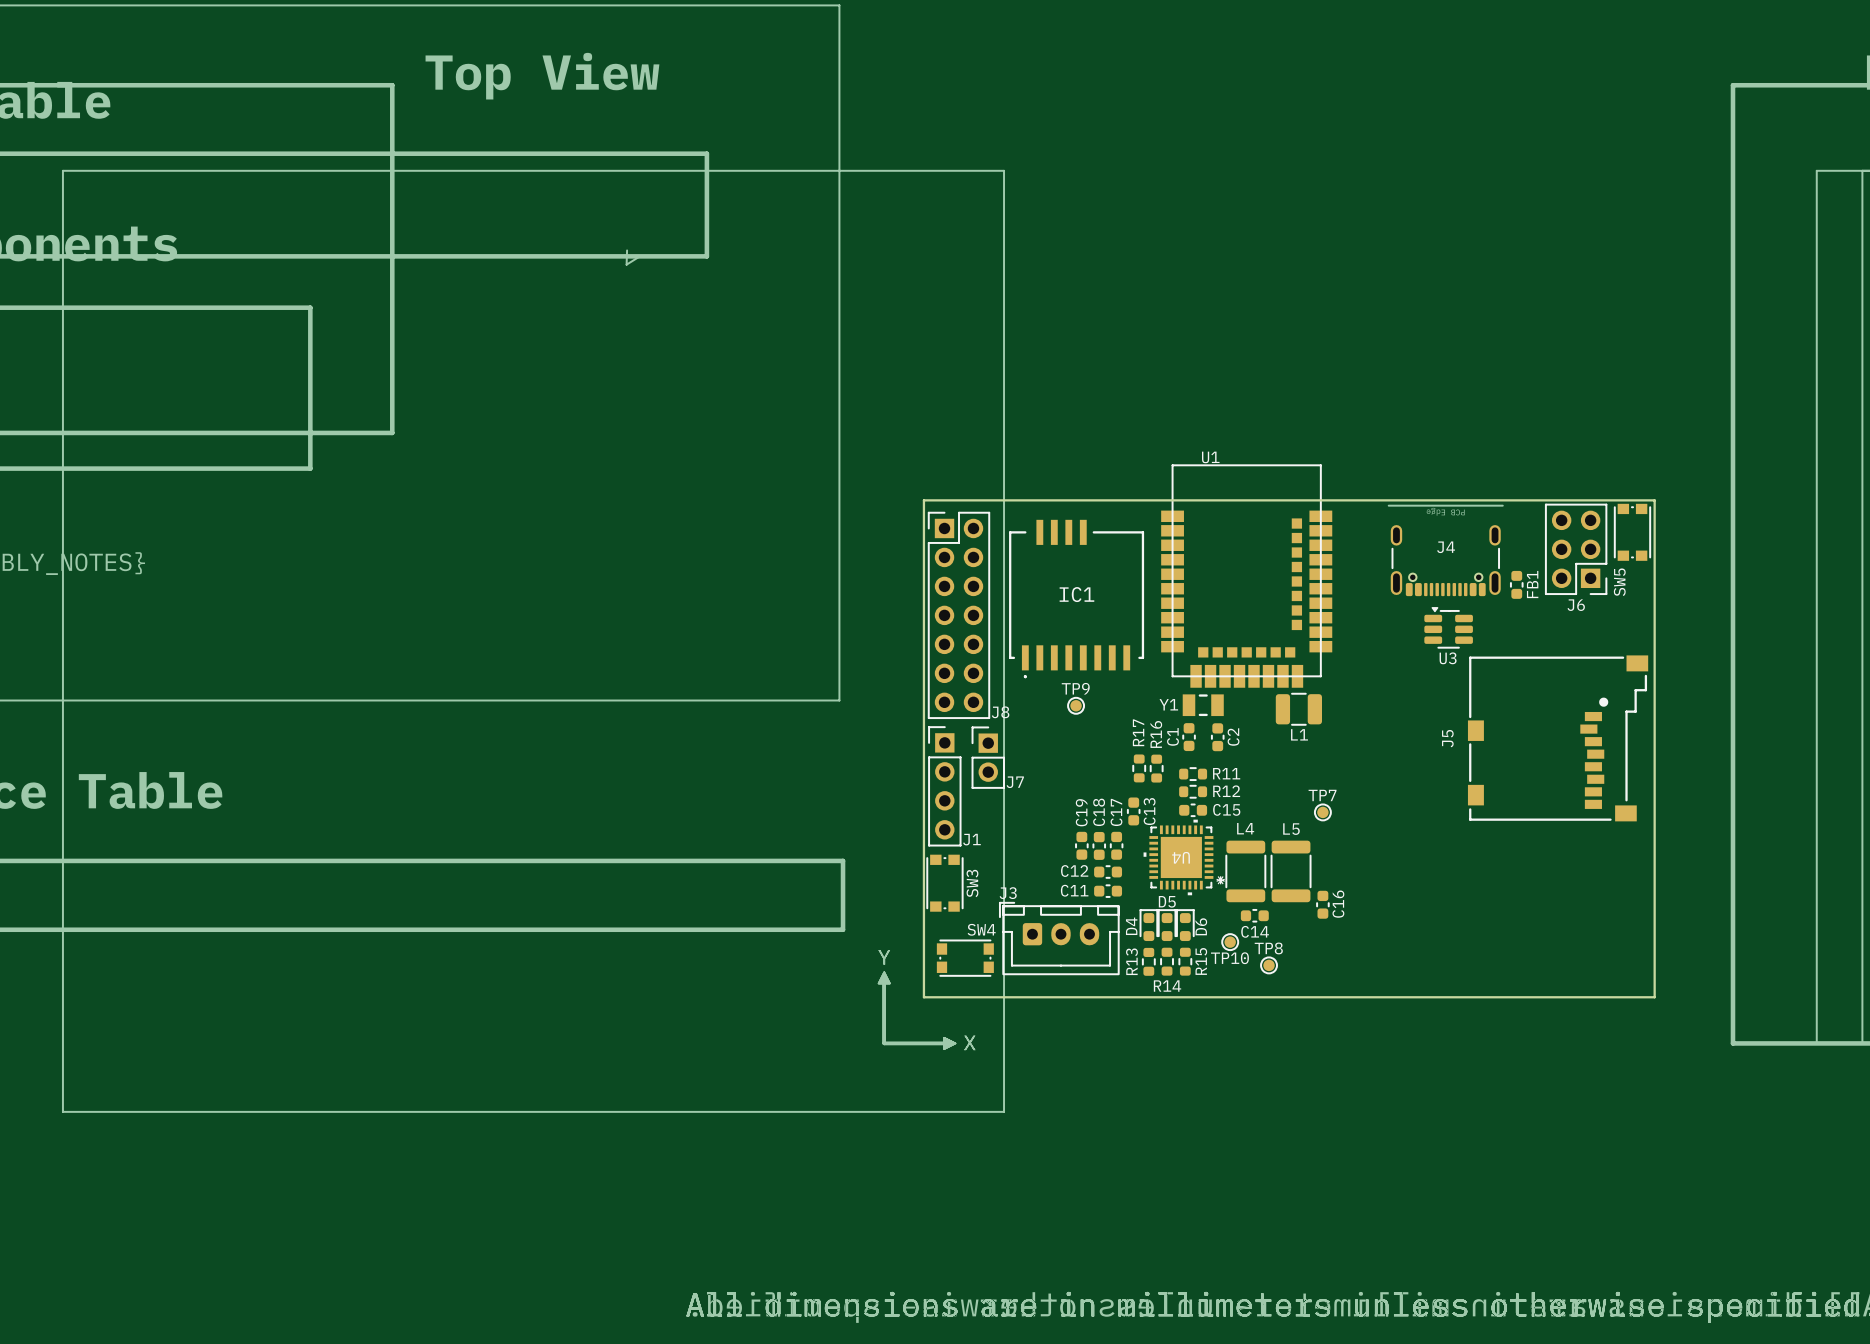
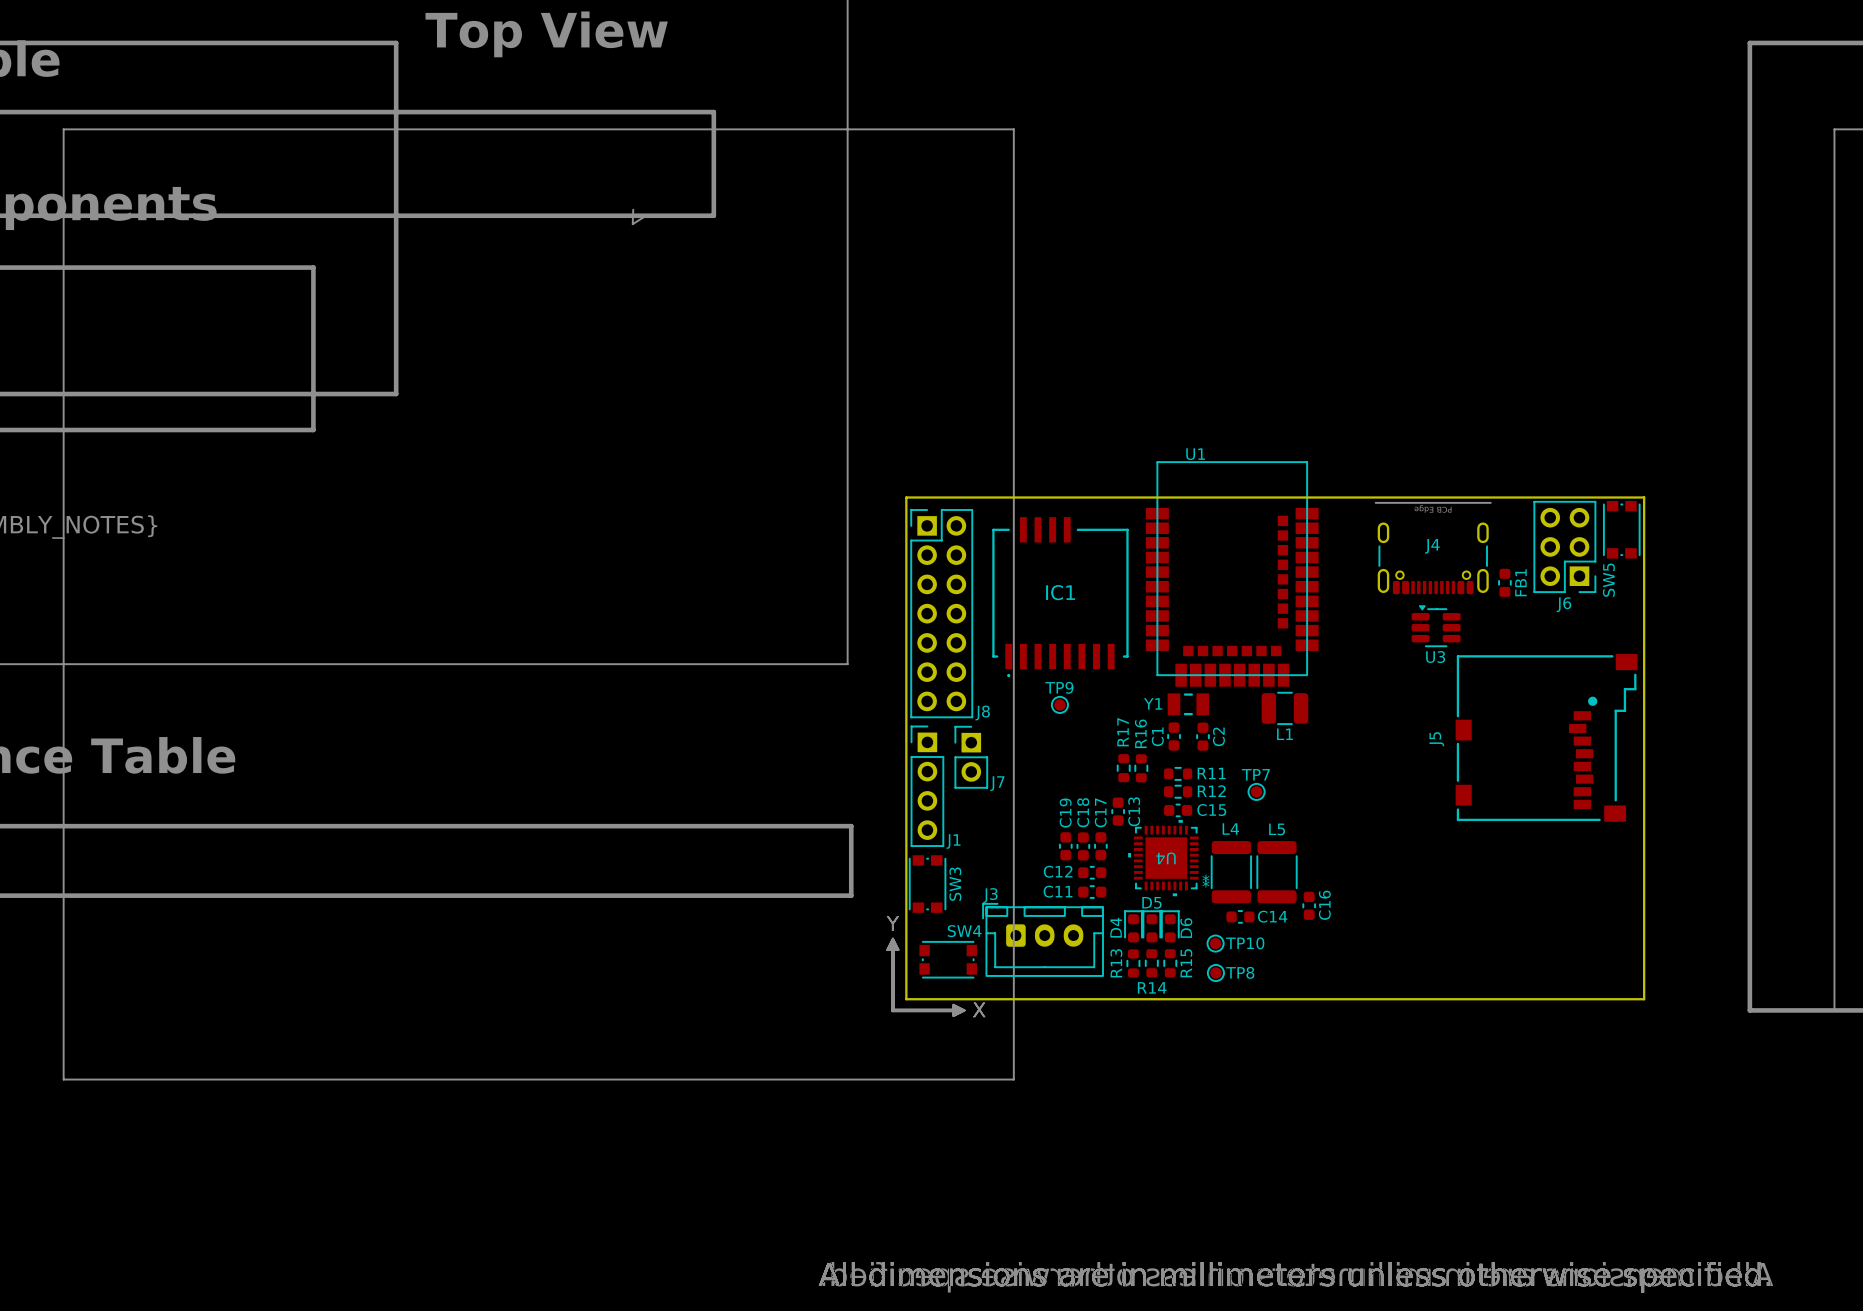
board edge: (923, 500) (1654, 500) (1654, 997) (923, 997) (923, 500) -> (906, 497) (1644, 497) (1644, 999) (906, 999) (906, 497)
SW5 position: (1632, 532) -> (1621, 529)
J6 position: (1576, 549) -> (1564, 546)
J4 position: (1445, 550) -> (1433, 548)
U1 position: (1246, 576) -> (1232, 574)
FB1 position: (1516, 584) -> (1504, 582)
IC1 position: (1076, 598) -> (1060, 596)
J8 position: (959, 615) -> (941, 613)
U3 position: (1448, 627) -> (1436, 626)
TP9 position: (1076, 705) -> (1059, 704)
Y1 position: (1203, 705) -> (1188, 704)
L1 position: (1298, 709) -> (1284, 708)
C1 position: (1189, 737) -> (1174, 736)
C2 position: (1217, 737) -> (1202, 736)
J5 position: (1558, 738) -> (1546, 737)
J7 position: (988, 757) -> (971, 757)
R17 position: (1139, 768) -> (1123, 768)
R16 position: (1156, 768) -> (1141, 768)
R11 position: (1193, 774) -> (1178, 773)
J1 position: (944, 786) -> (927, 786)
R12 position: (1193, 791) -> (1178, 791)
C15 position: (1193, 810) -> (1178, 810)
C13 position: (1133, 811) -> (1118, 811)
TP7 position: (1322, 812) -> (1256, 791)
C19 position: (1081, 845) -> (1065, 846)
C18 position: (1099, 845) -> (1083, 846)
C17 position: (1116, 845) -> (1100, 846)
U4 position: (1178, 857) -> (1163, 858)
L4 position: (1245, 871) -> (1231, 872)
L5 position: (1291, 871) -> (1277, 872)
C12 position: (1108, 872) -> (1092, 872)
SW3 position: (944, 883) -> (927, 884)
C11 position: (1108, 891) -> (1092, 892)
C16 position: (1322, 904) -> (1309, 905)
C14 position: (1254, 915) -> (1240, 916)
D4 position: (1148, 925) -> (1133, 926)
D5 position: (1167, 925) -> (1151, 926)
D6 position: (1185, 925) -> (1170, 926)
C14 name position: C14 (1255, 931) -> C14 (1272, 916)
J3 position: (1059, 938) -> (1043, 939)
TP10 position: (1230, 942) -> (1215, 943)
TP8 name position: TP8 (1268, 948) -> TP8 (1240, 972)
SW4 position: (965, 958) -> (948, 959)
TP10 name position: TP10 (1229, 958) -> TP10 (1245, 943)
R13 position: (1148, 961) -> (1133, 963)
R14 position: (1167, 961) -> (1151, 963)
R15 position: (1185, 961) -> (1170, 963)
TP8 position: (1269, 965) -> (1215, 972)

